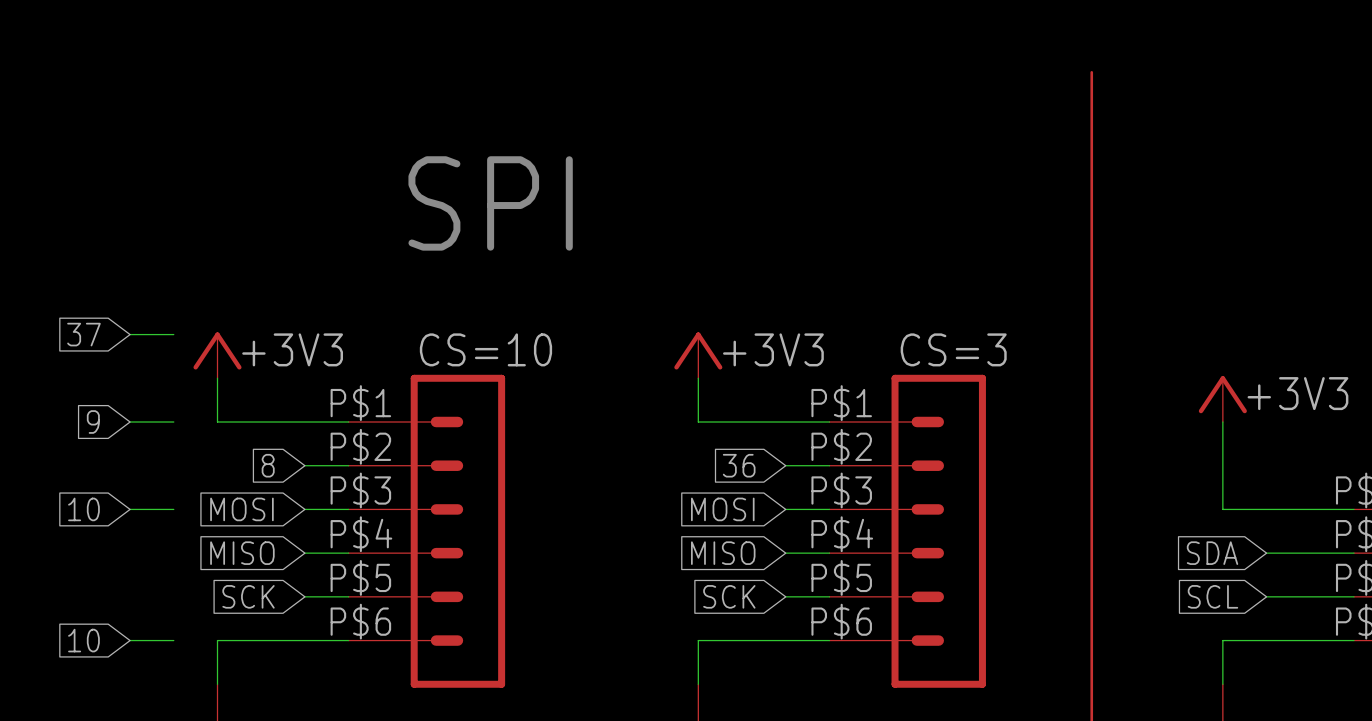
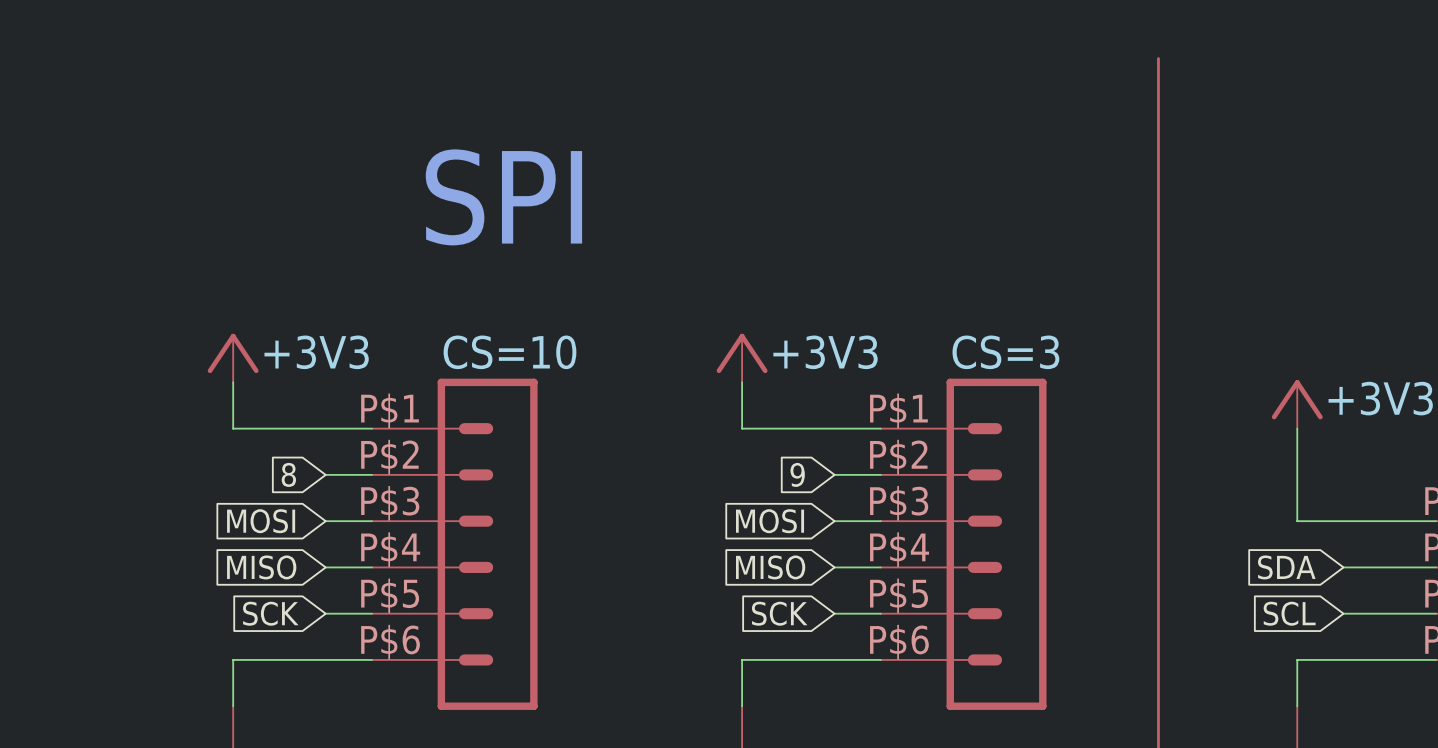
global label: 37 (83, 334) -> none
wire: (130, 334) (173, 334) -> none
global label: 9 (93, 422) -> none
wire: (130, 422) (173, 422) -> none
global label: 36 (739, 465) -> 9 (797, 474)
global label: 10 (83, 509) -> none
wire: (130, 509) (173, 509) -> none
global label: 10 (83, 640) -> none
wire: (130, 640) (173, 640) -> none

